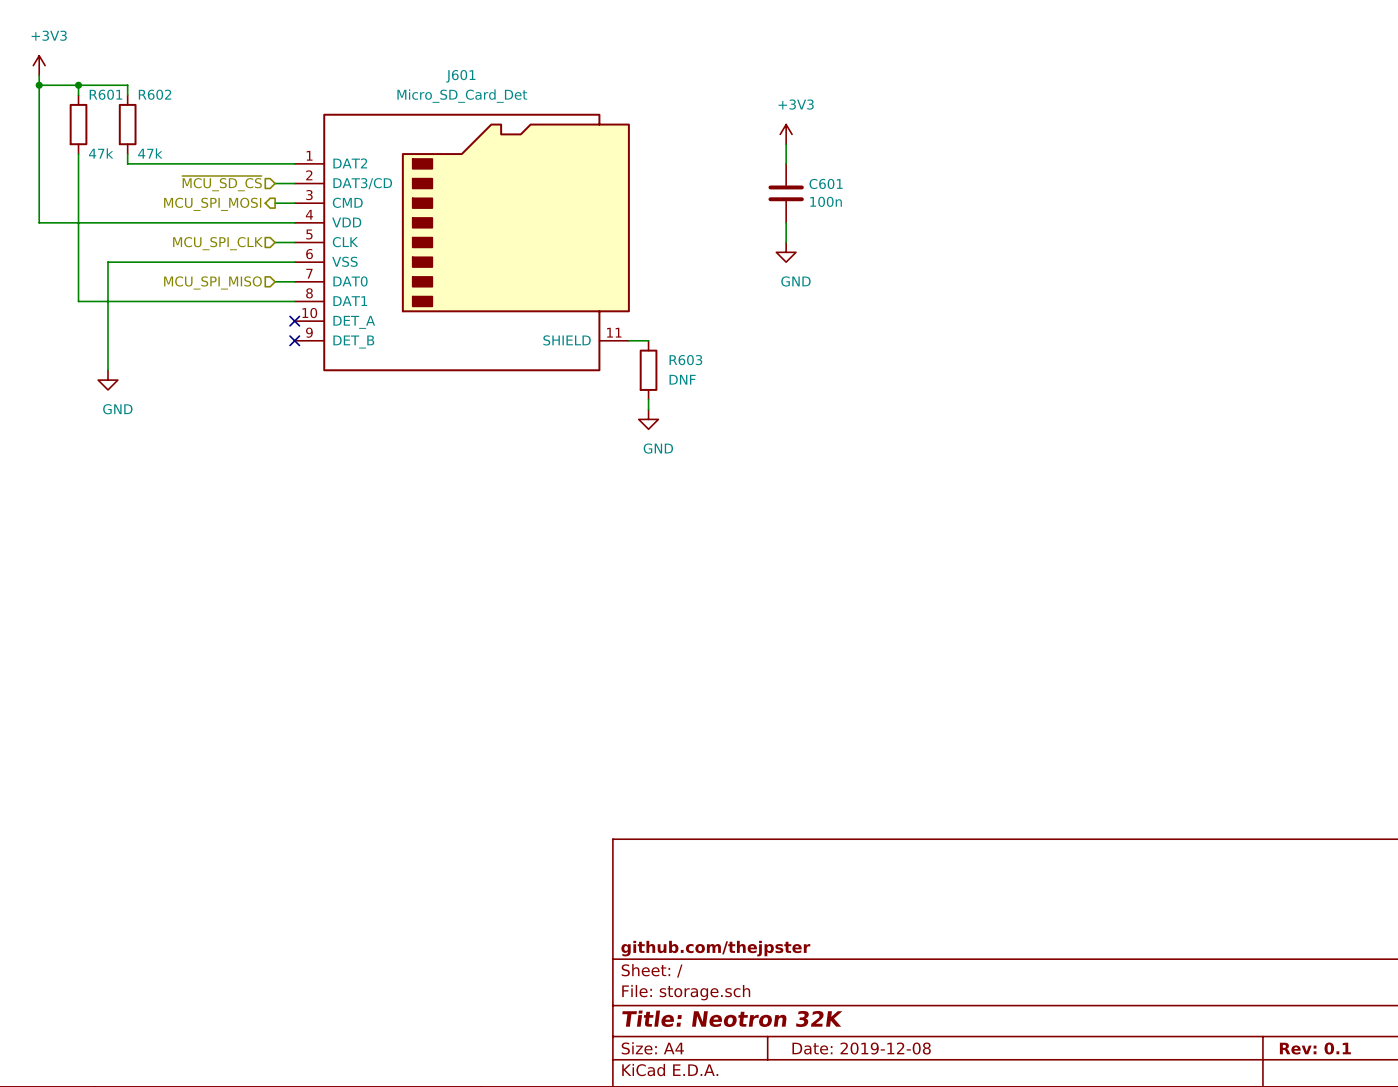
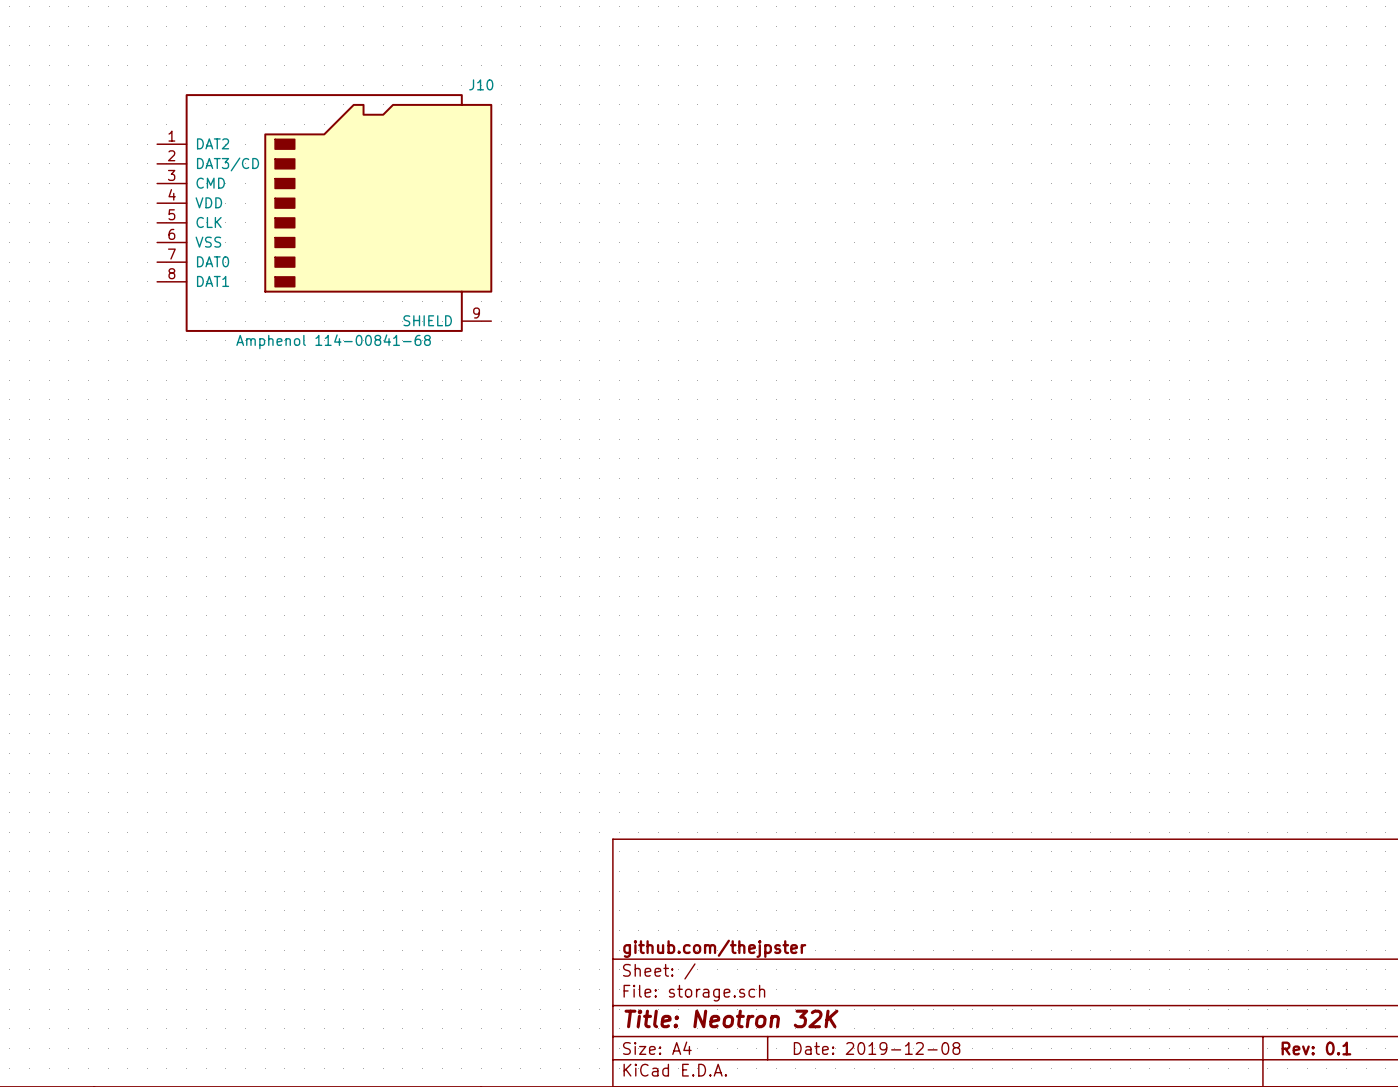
power symbol: +3V3 (39, 65) -> none
wire: (39, 75) (39, 222) (294, 222) -> none
wire: (39, 85) (127, 85) (127, 95) -> none
junction: (39, 85) -> none
wire: (78, 85) (78, 95) -> none
junction: (78, 85) -> none
R601: 47k (78, 124) -> none
R602: 47k (127, 124) -> none
power symbol: +3V3 (786, 134) -> none
wire: (786, 144) (786, 163) -> none
wire: (78, 154) (78, 301) (294, 301) -> none
wire: (127, 154) (127, 163) (294, 163) -> none
hierarchical label: ~{MCU_SD_CS} (222, 183) -> none
C601: 100n (786, 193) -> none
hierarchical label: MCU_SPI_MOSI (212, 204) -> none
J10: none -> Amphenol 114-00841-68 (324, 213)
wire: (786, 222) (786, 242) -> none
J601: Micro_SD_Card_Det (462, 242) -> none
hierarchical label: MCU_SPI_CLK (218, 243) -> none
power symbol: GND (786, 252) -> none
wire: (294, 262) (108, 262) (108, 370) -> none
hierarchical label: MCU_SPI_MISO (212, 282) -> none
no-connect mark: (294, 321) -> none
no-connect mark: (294, 340) -> none
wire: (628, 340) (648, 340) -> none
R603: DNF (648, 370) -> none
power symbol: GND (108, 380) -> none
wire: (648, 399) (648, 409) -> none
power symbol: GND (648, 419) -> none

